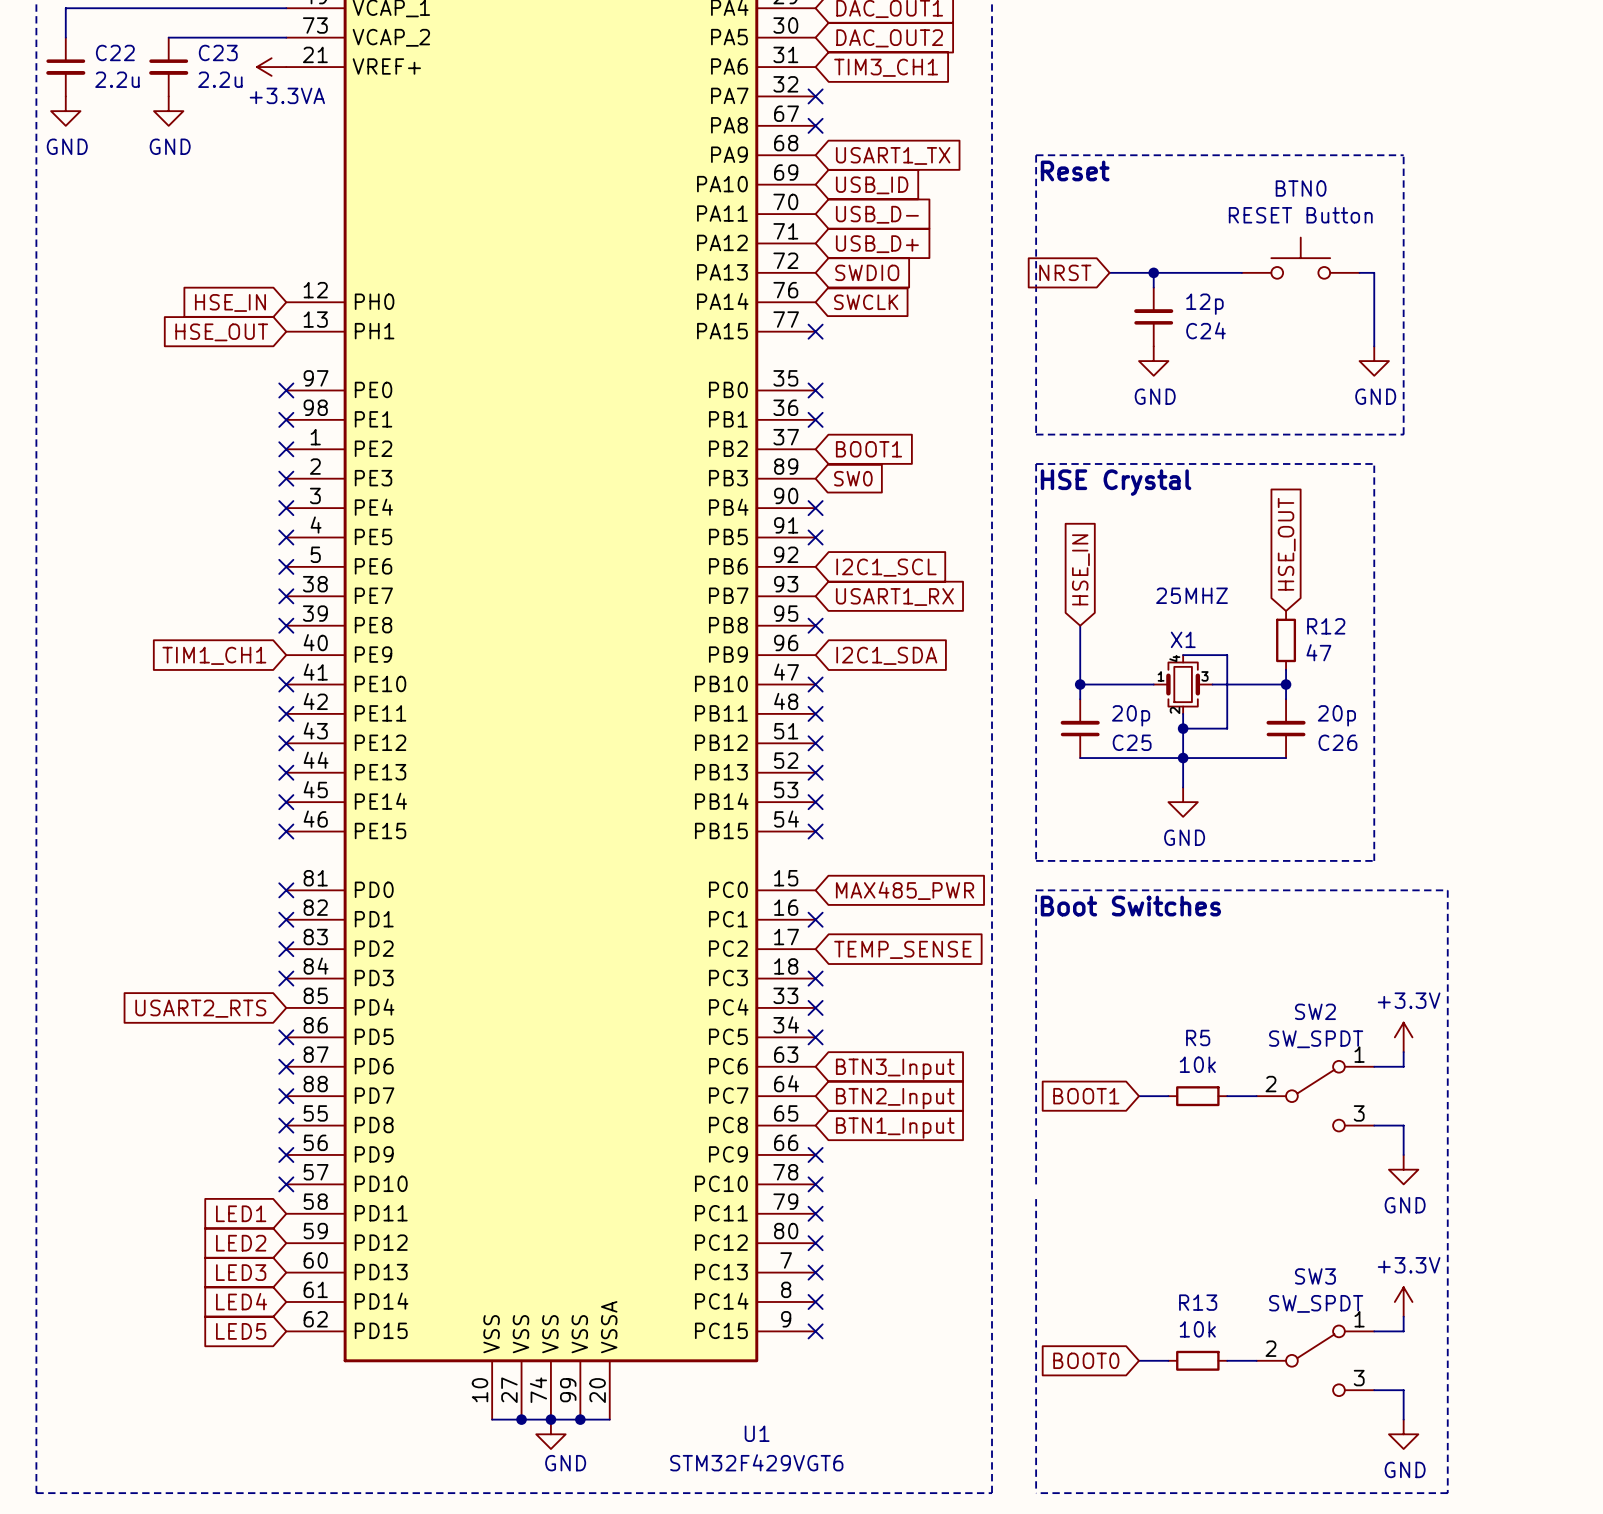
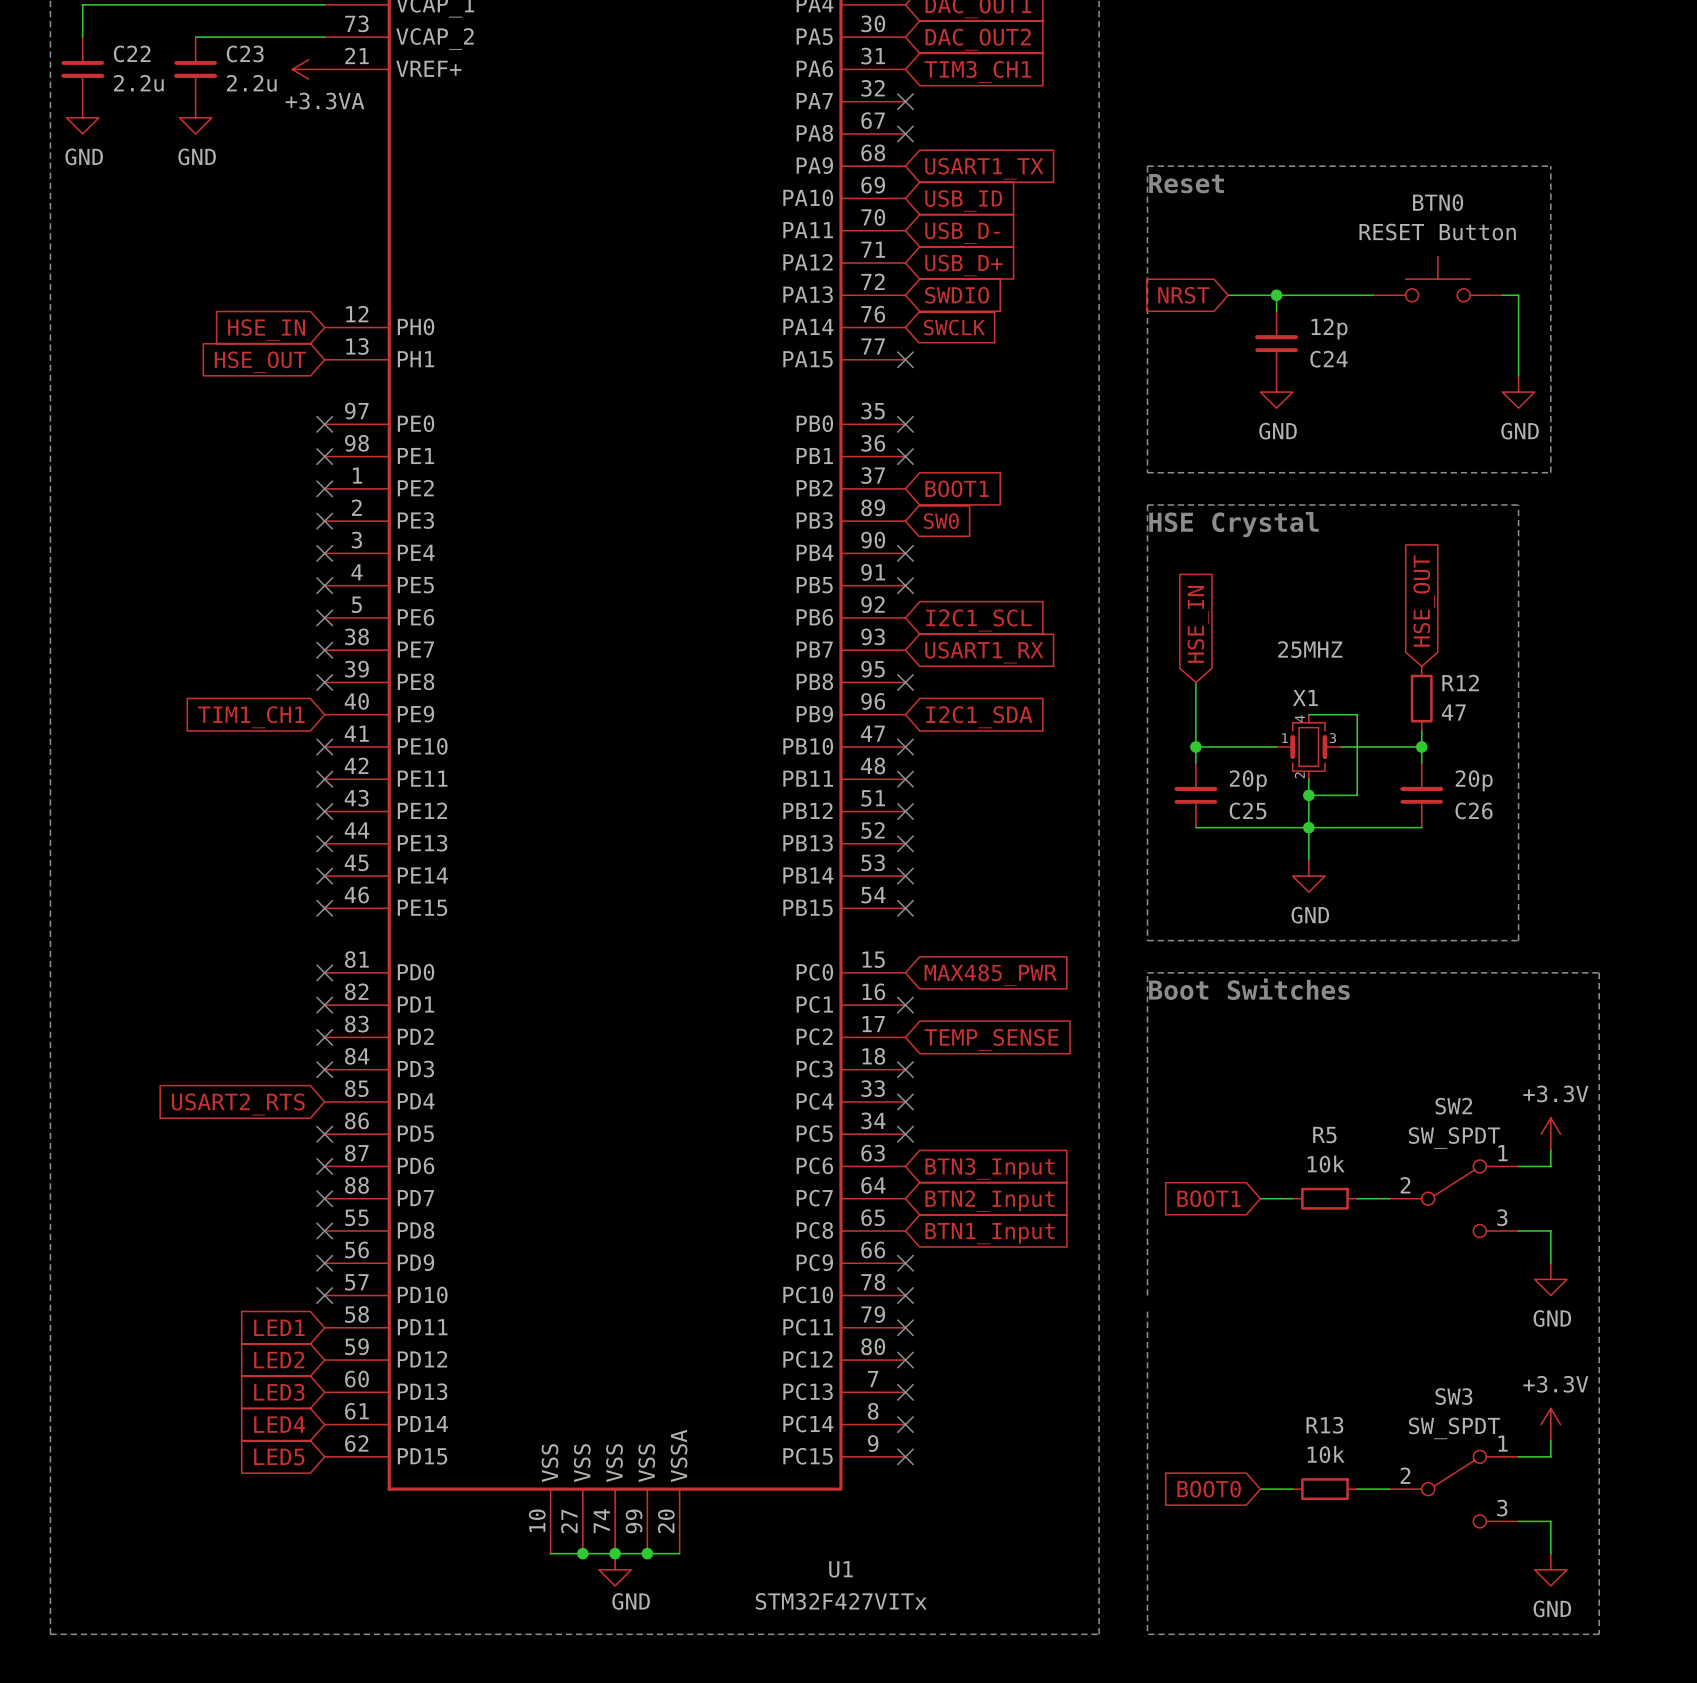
U1 value: STM32F429VGT6 (756, 1462) -> STM32F427VITx (841, 1601)

